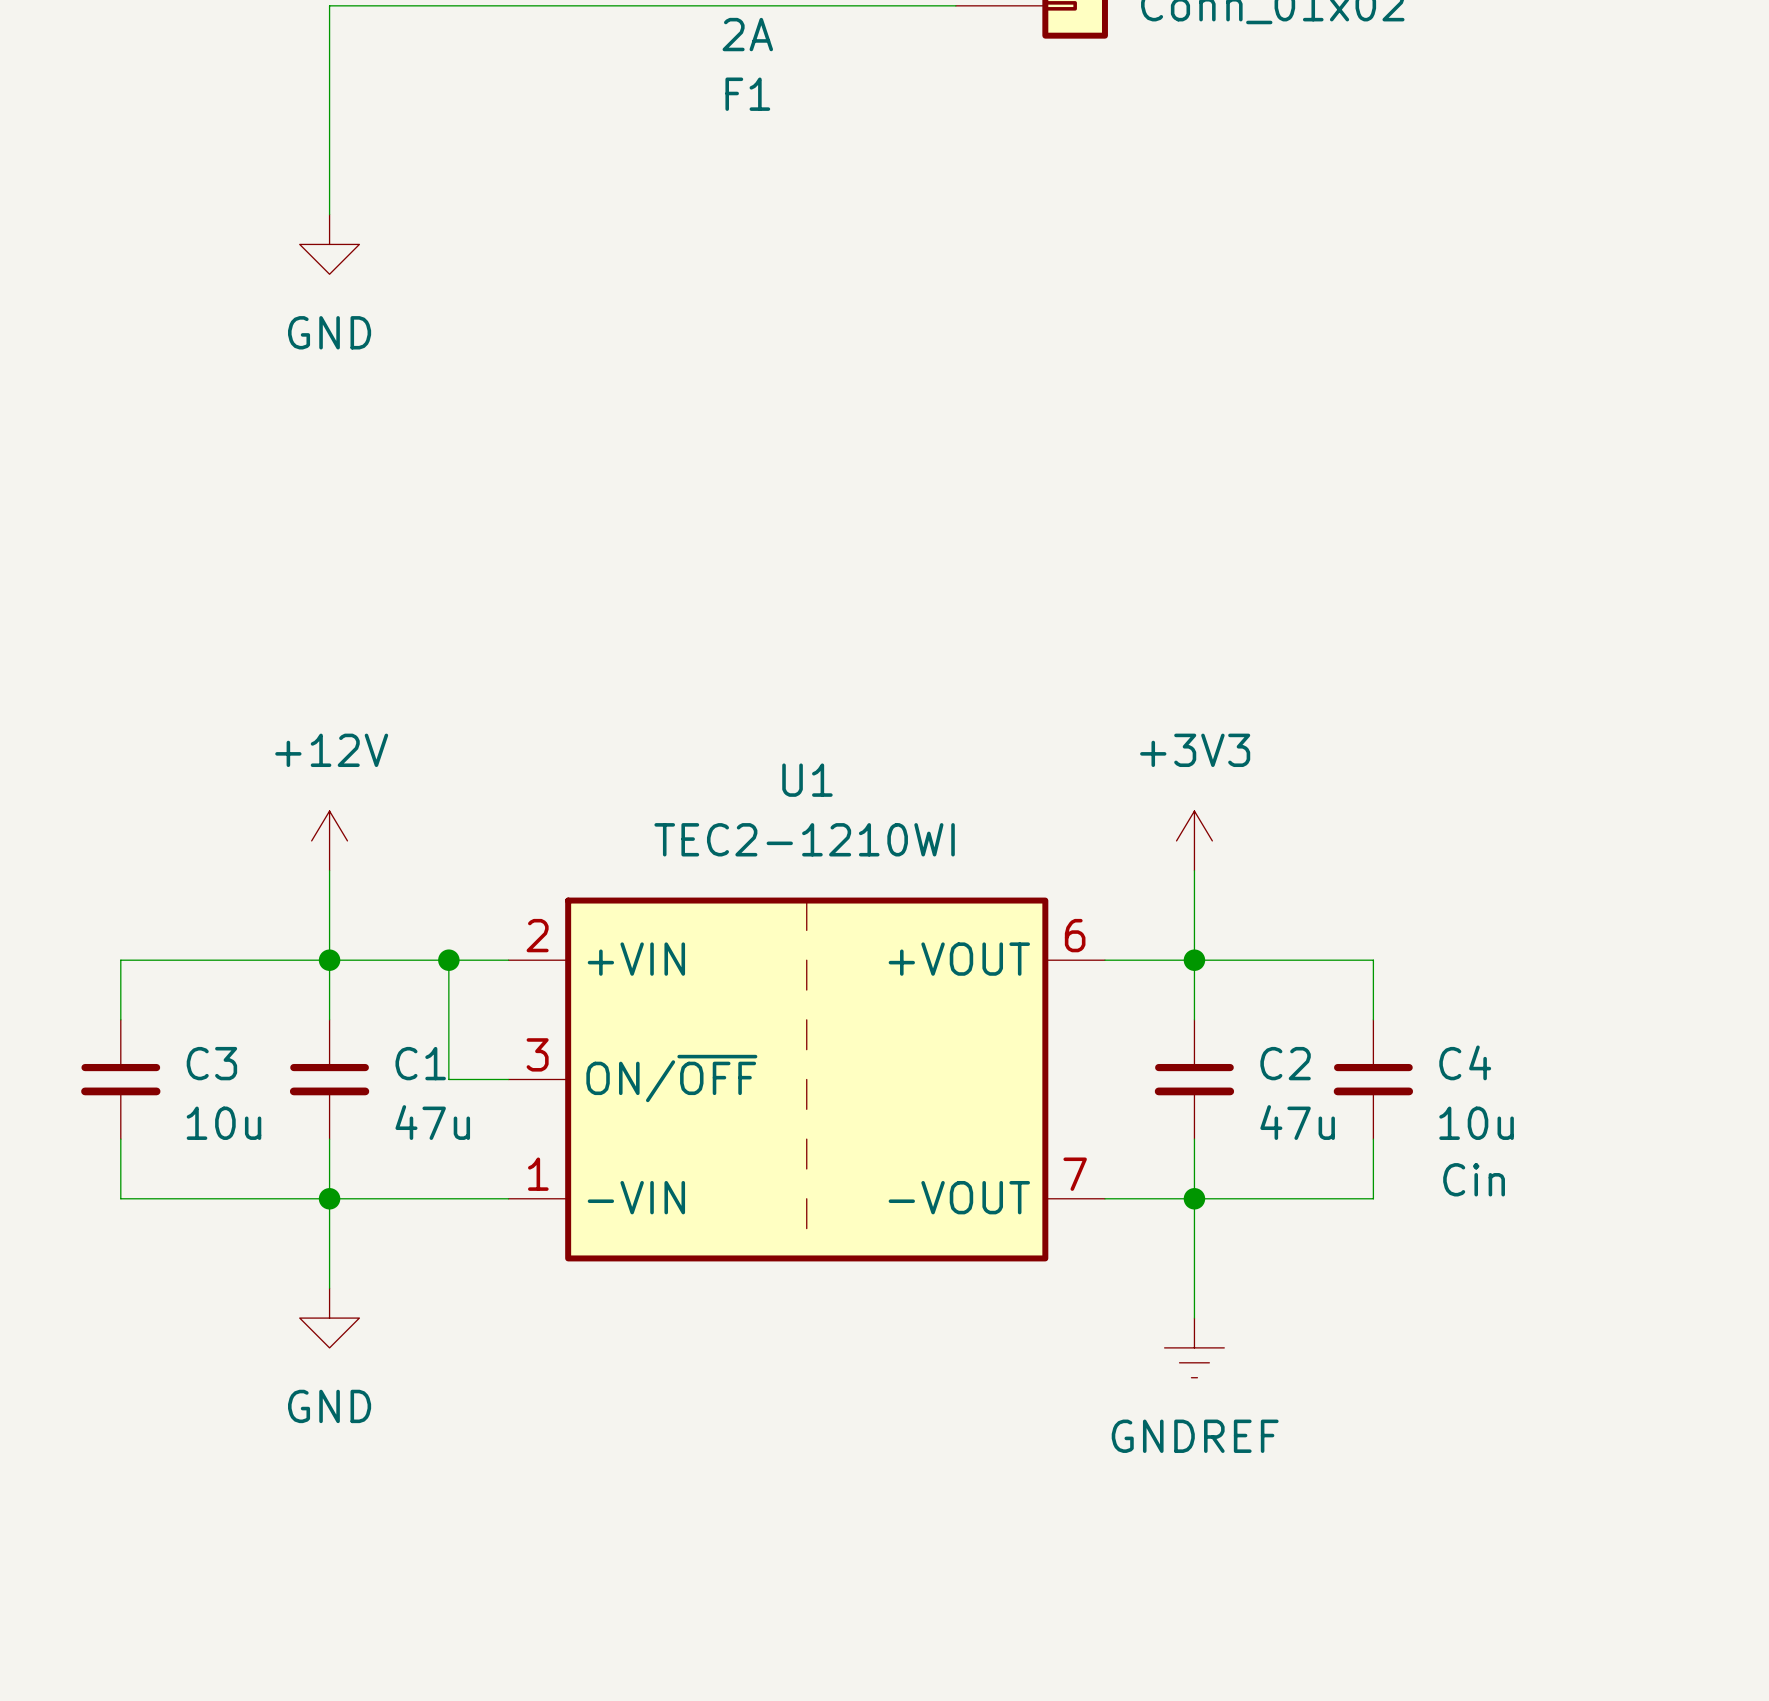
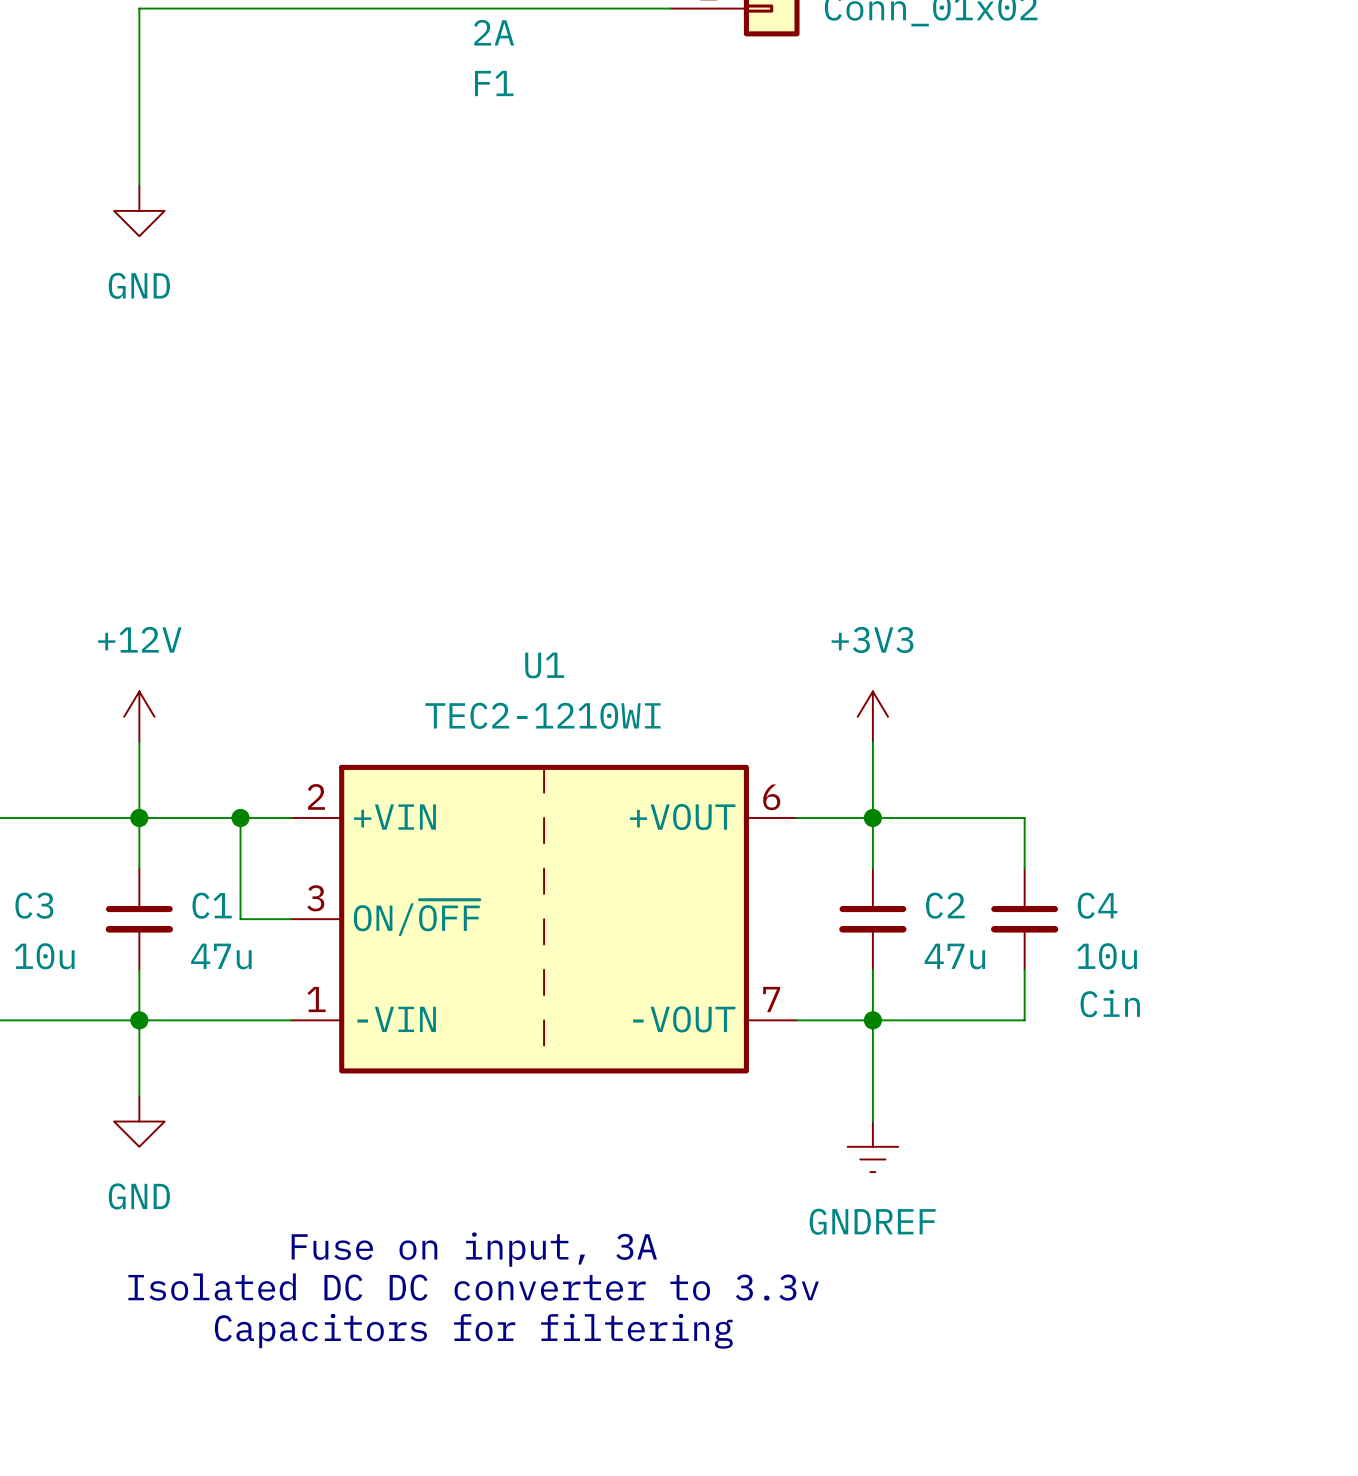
text: none -> Fuse on input, 3A (474, 1249)
text: none -> Isolated DC DC converter to 3.3v (473, 1287)
text: none -> Capacitors for filtering (473, 1331)

